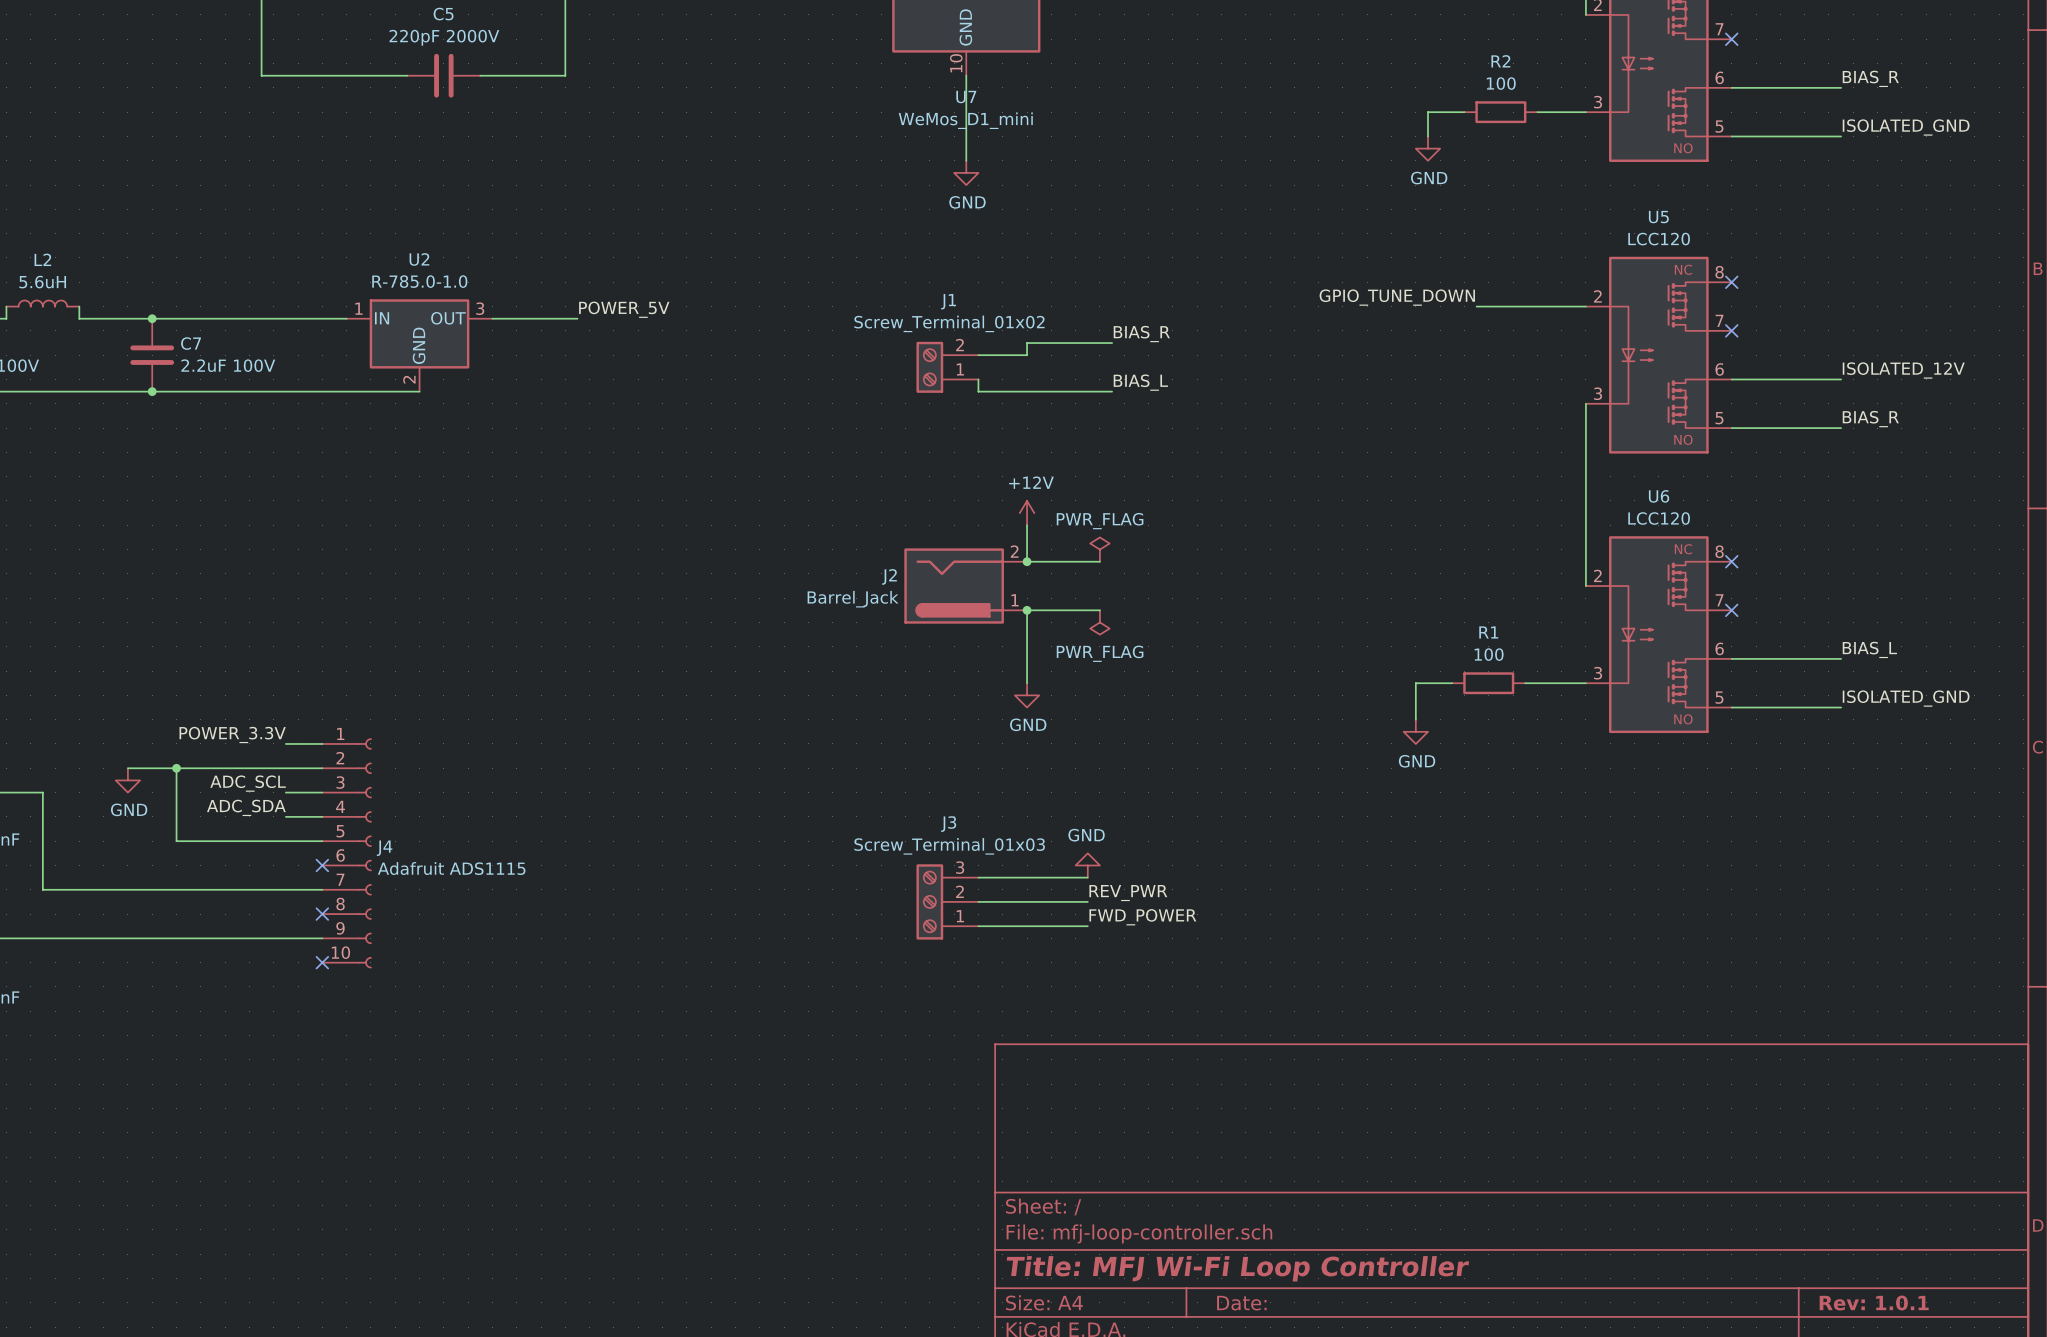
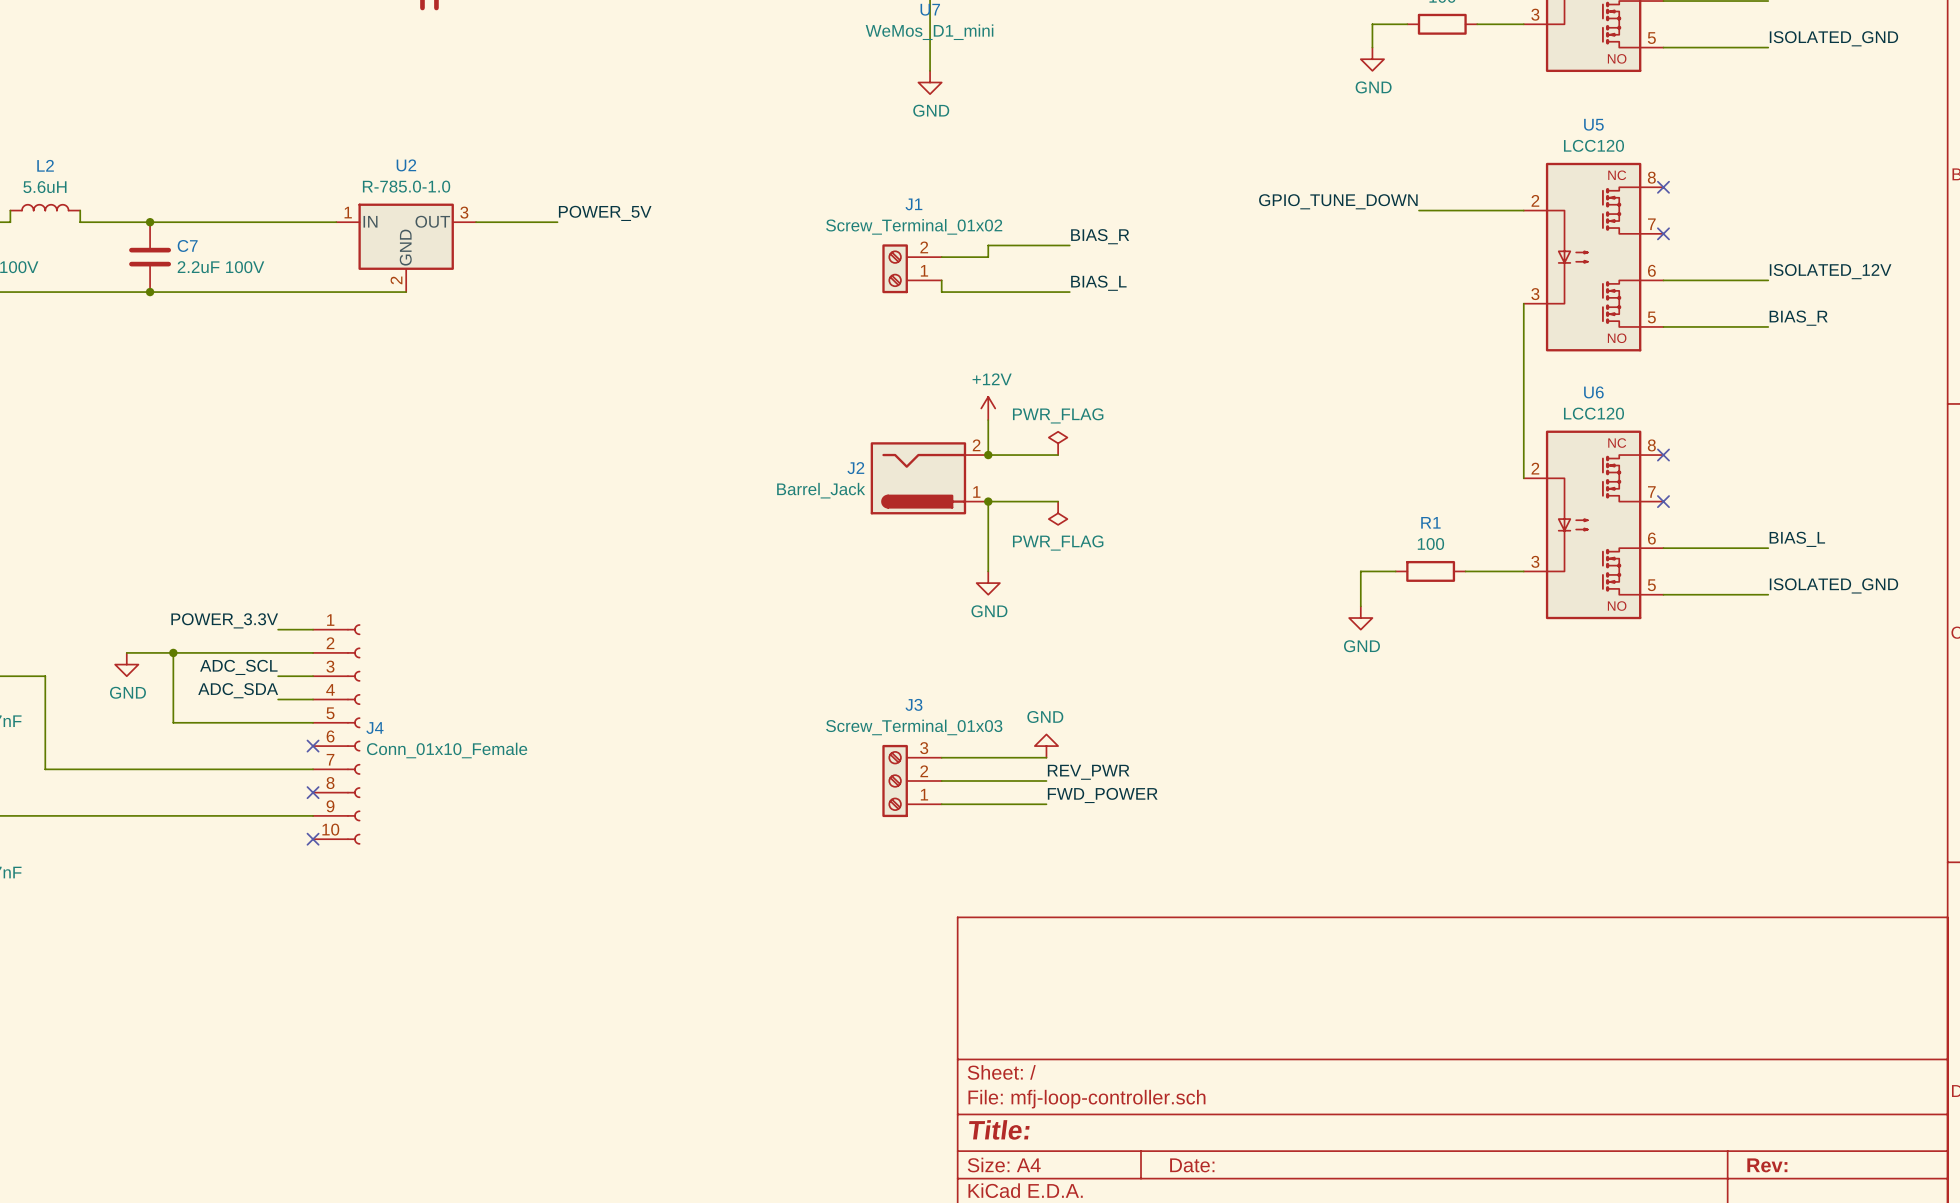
J4 value: Adafruit ADS1115 (451, 868) -> Conn_01x10_Female (447, 750)
title block: Title: MFJ Wi-Fi Loop Controller (1237, 1268) -> Title: (999, 1129)
title block: Rev: 1.0.1 (1874, 1303) -> Rev: (1767, 1165)

